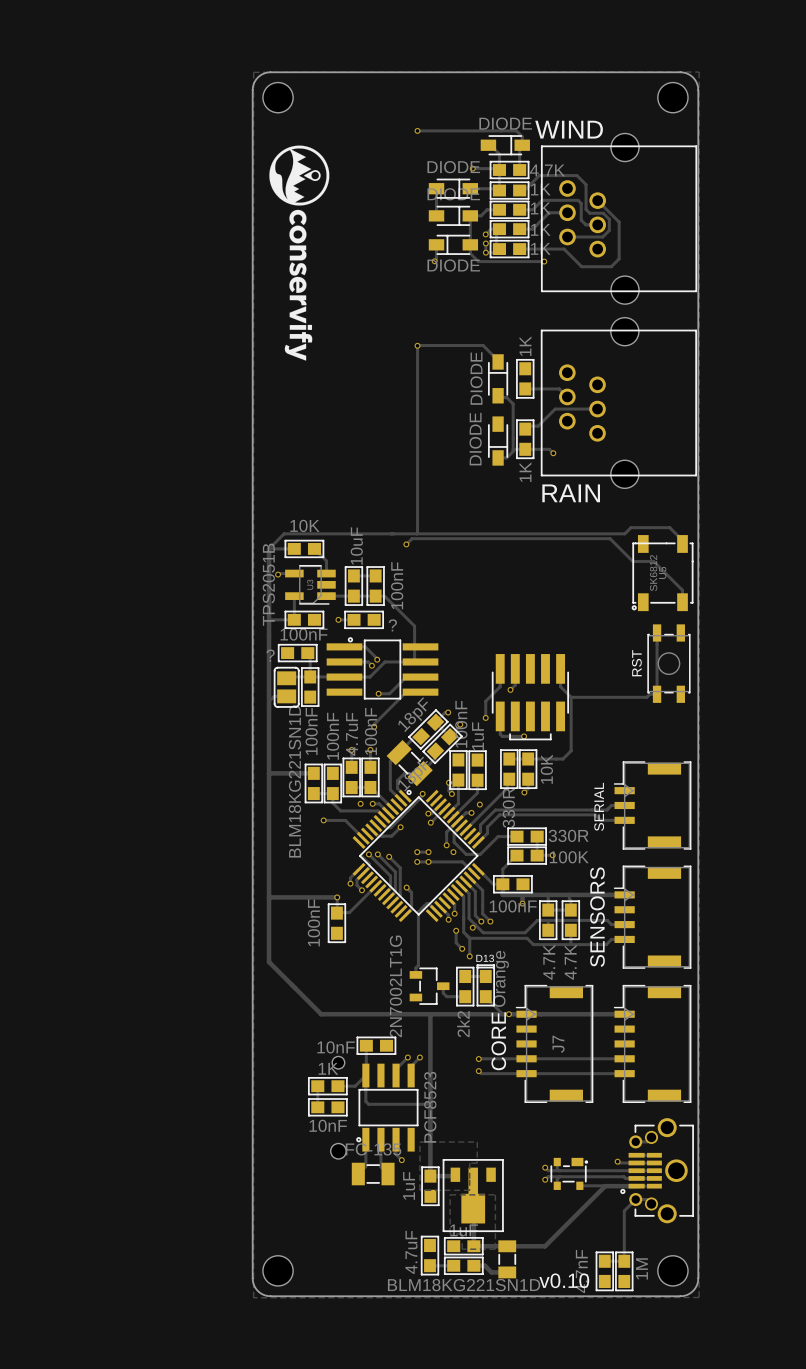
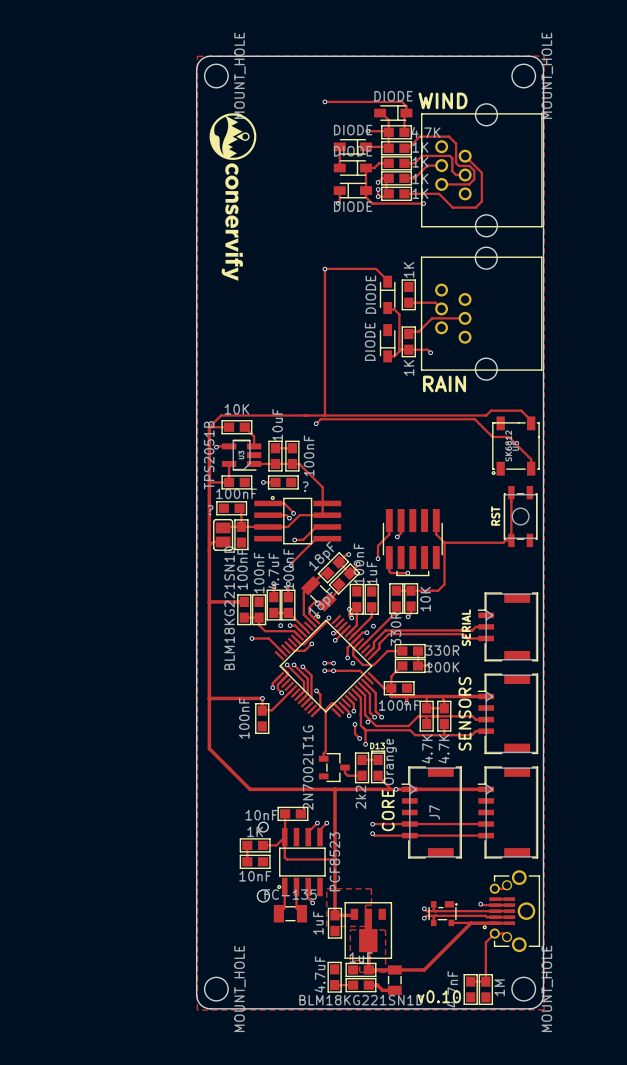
part value: none -> MOUNT_HOLE (239, 75)
part value: none -> MOUNT_HOLE (547, 75)
part value: none -> MOUNT_HOLE (239, 988)
part value: none -> MOUNT_HOLE (547, 988)

